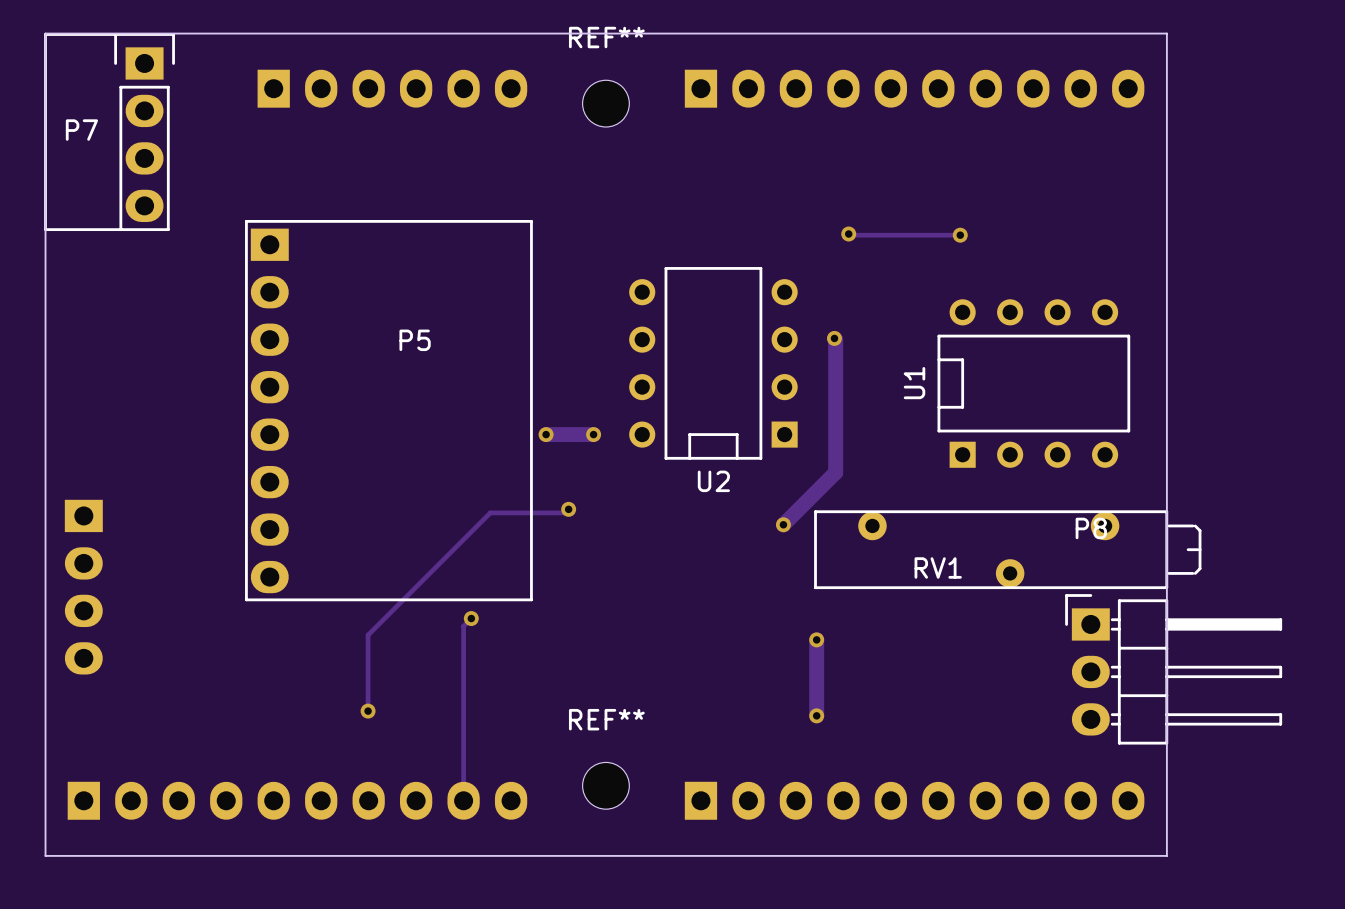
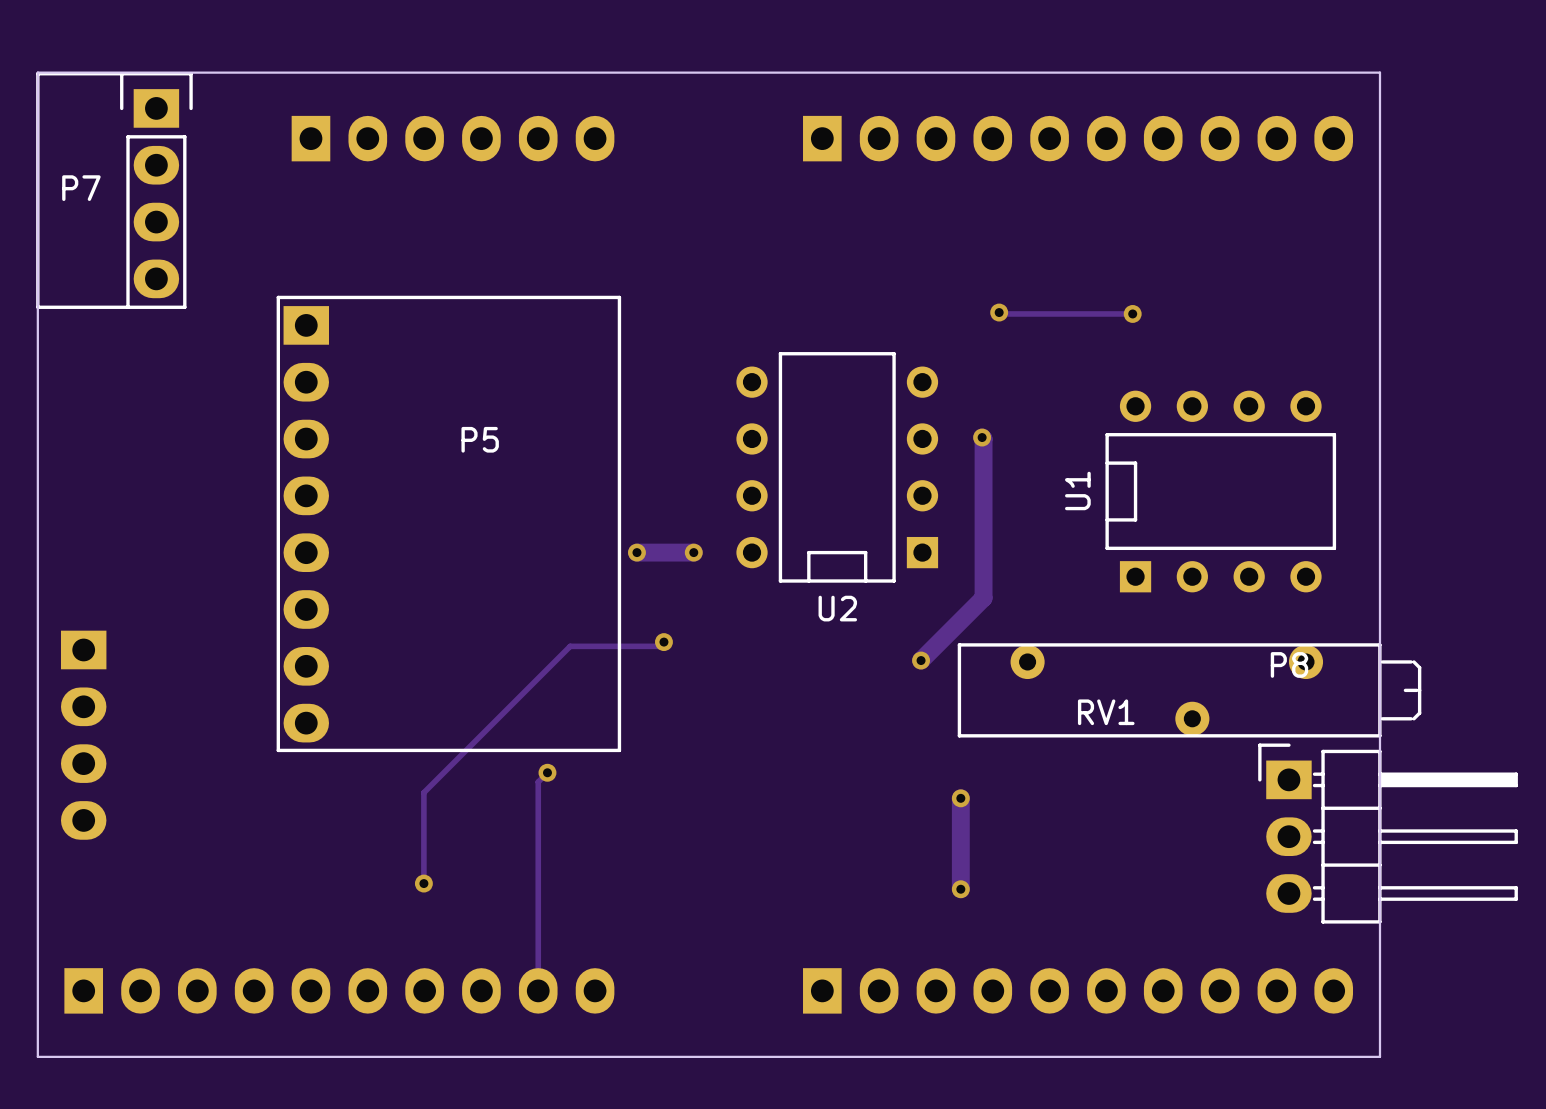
REF**: (605, 103) -> none
REF**: (605, 785) -> none

